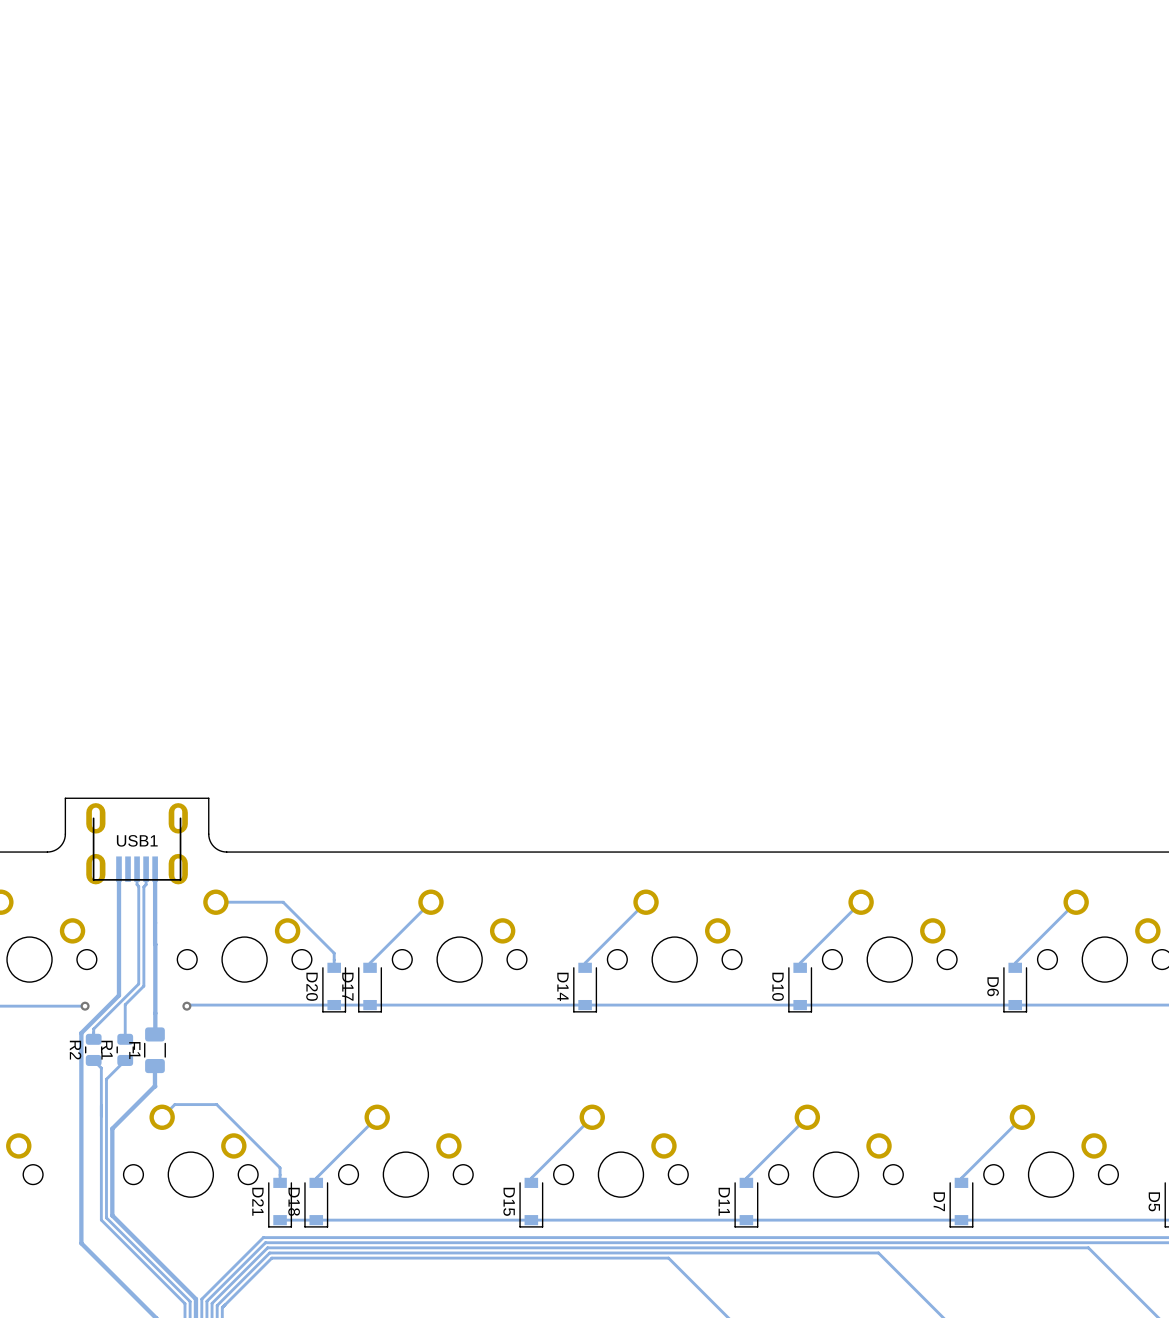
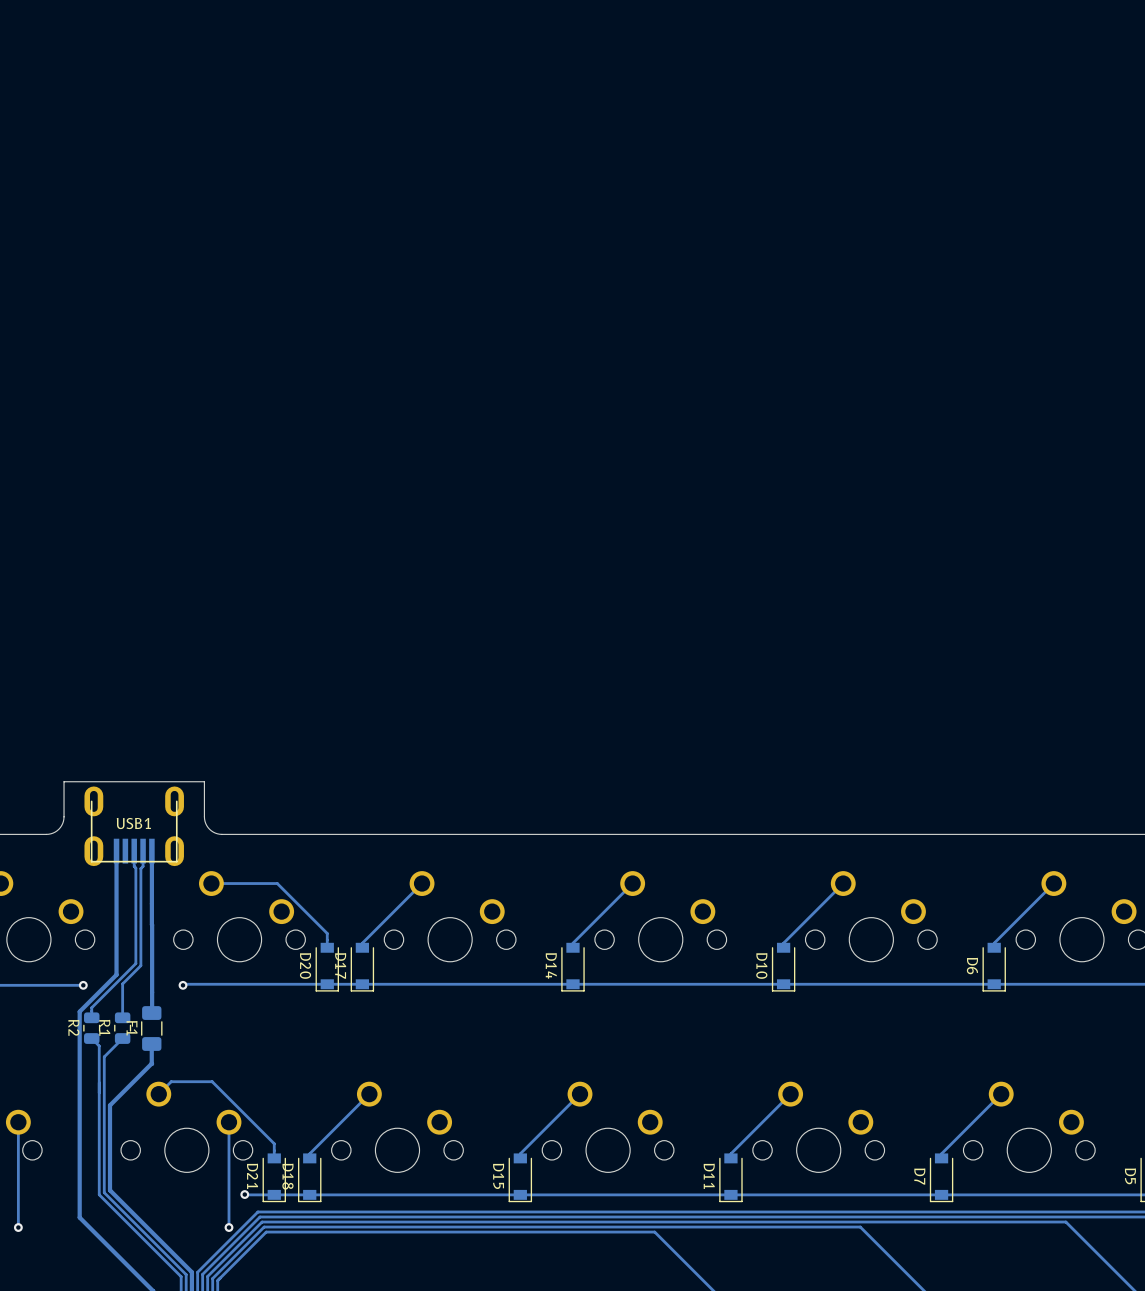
track: none -> (18, 1122) (18, 1227)
track: none -> (228, 1122) (228, 1227)
track: none -> (244, 1194) (274, 1194)
via: none -> (244, 1194)
via: none -> (18, 1227)
via: none -> (228, 1227)

